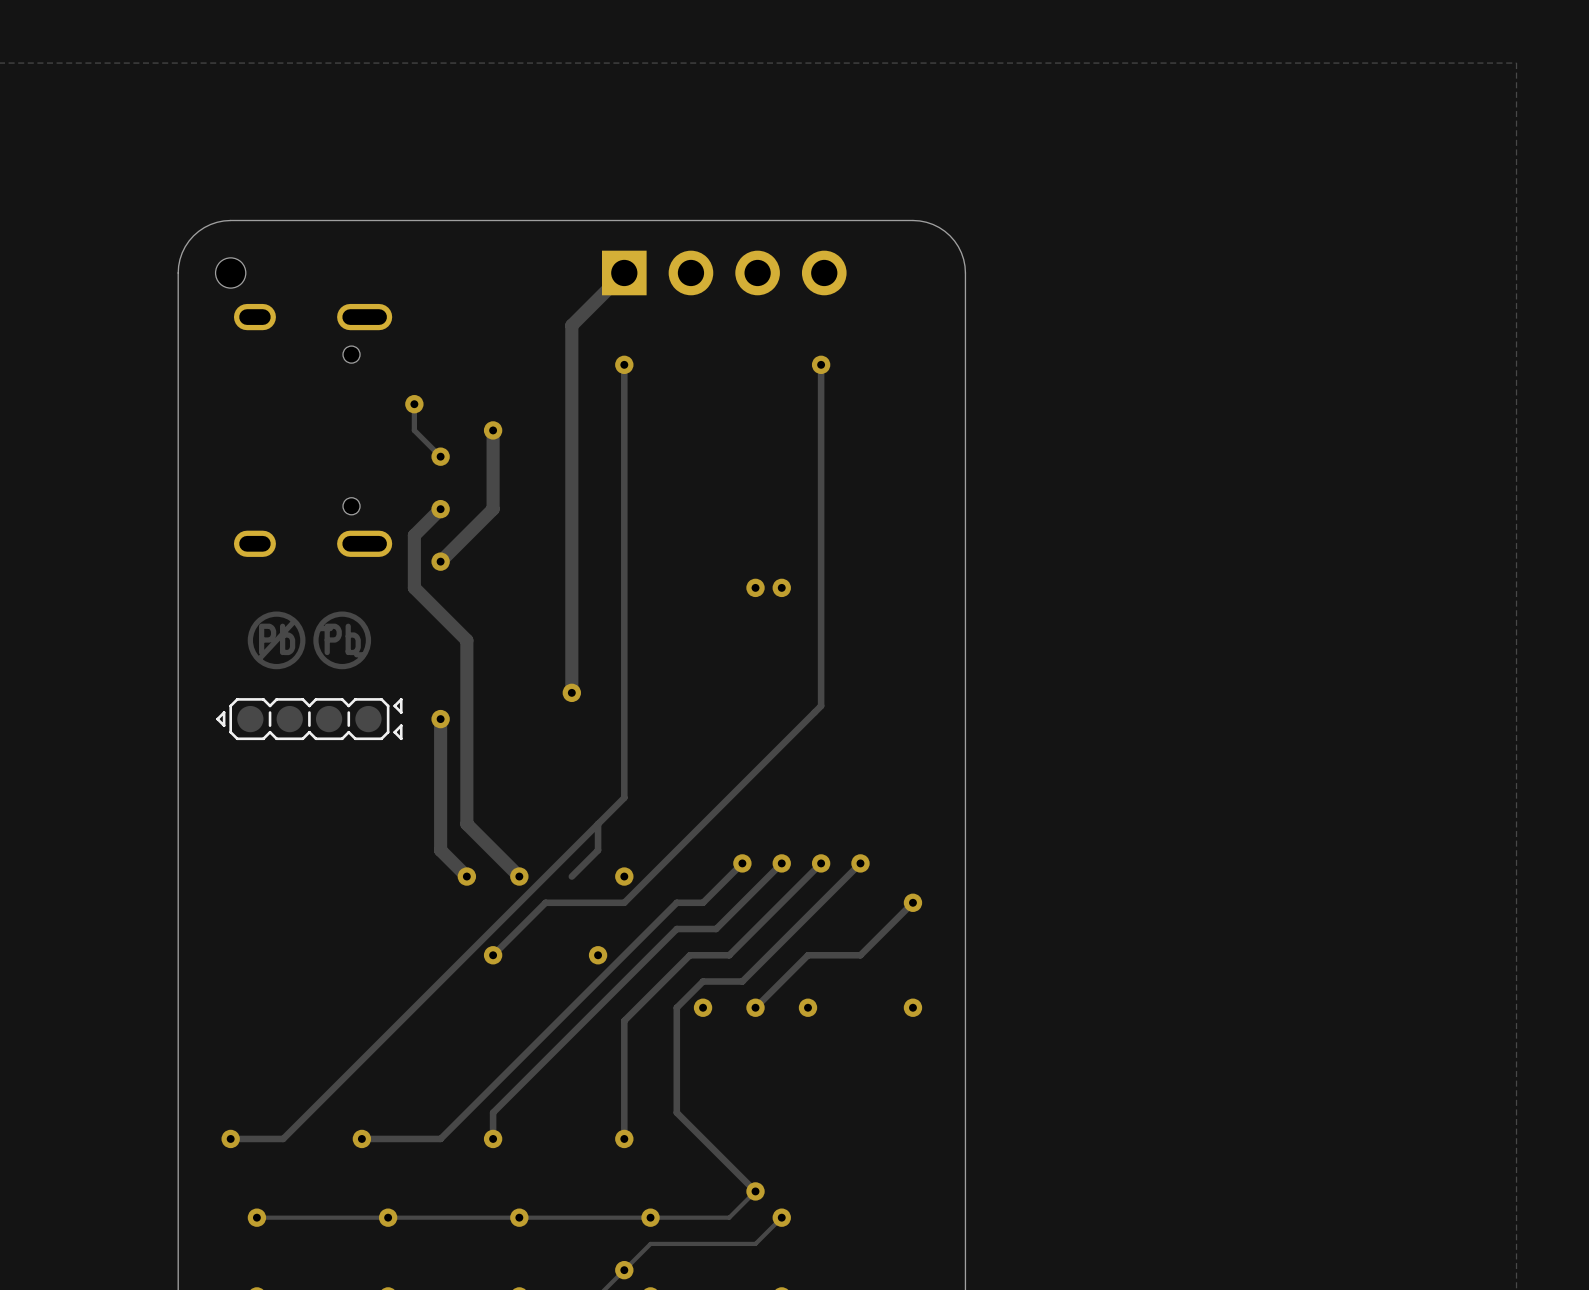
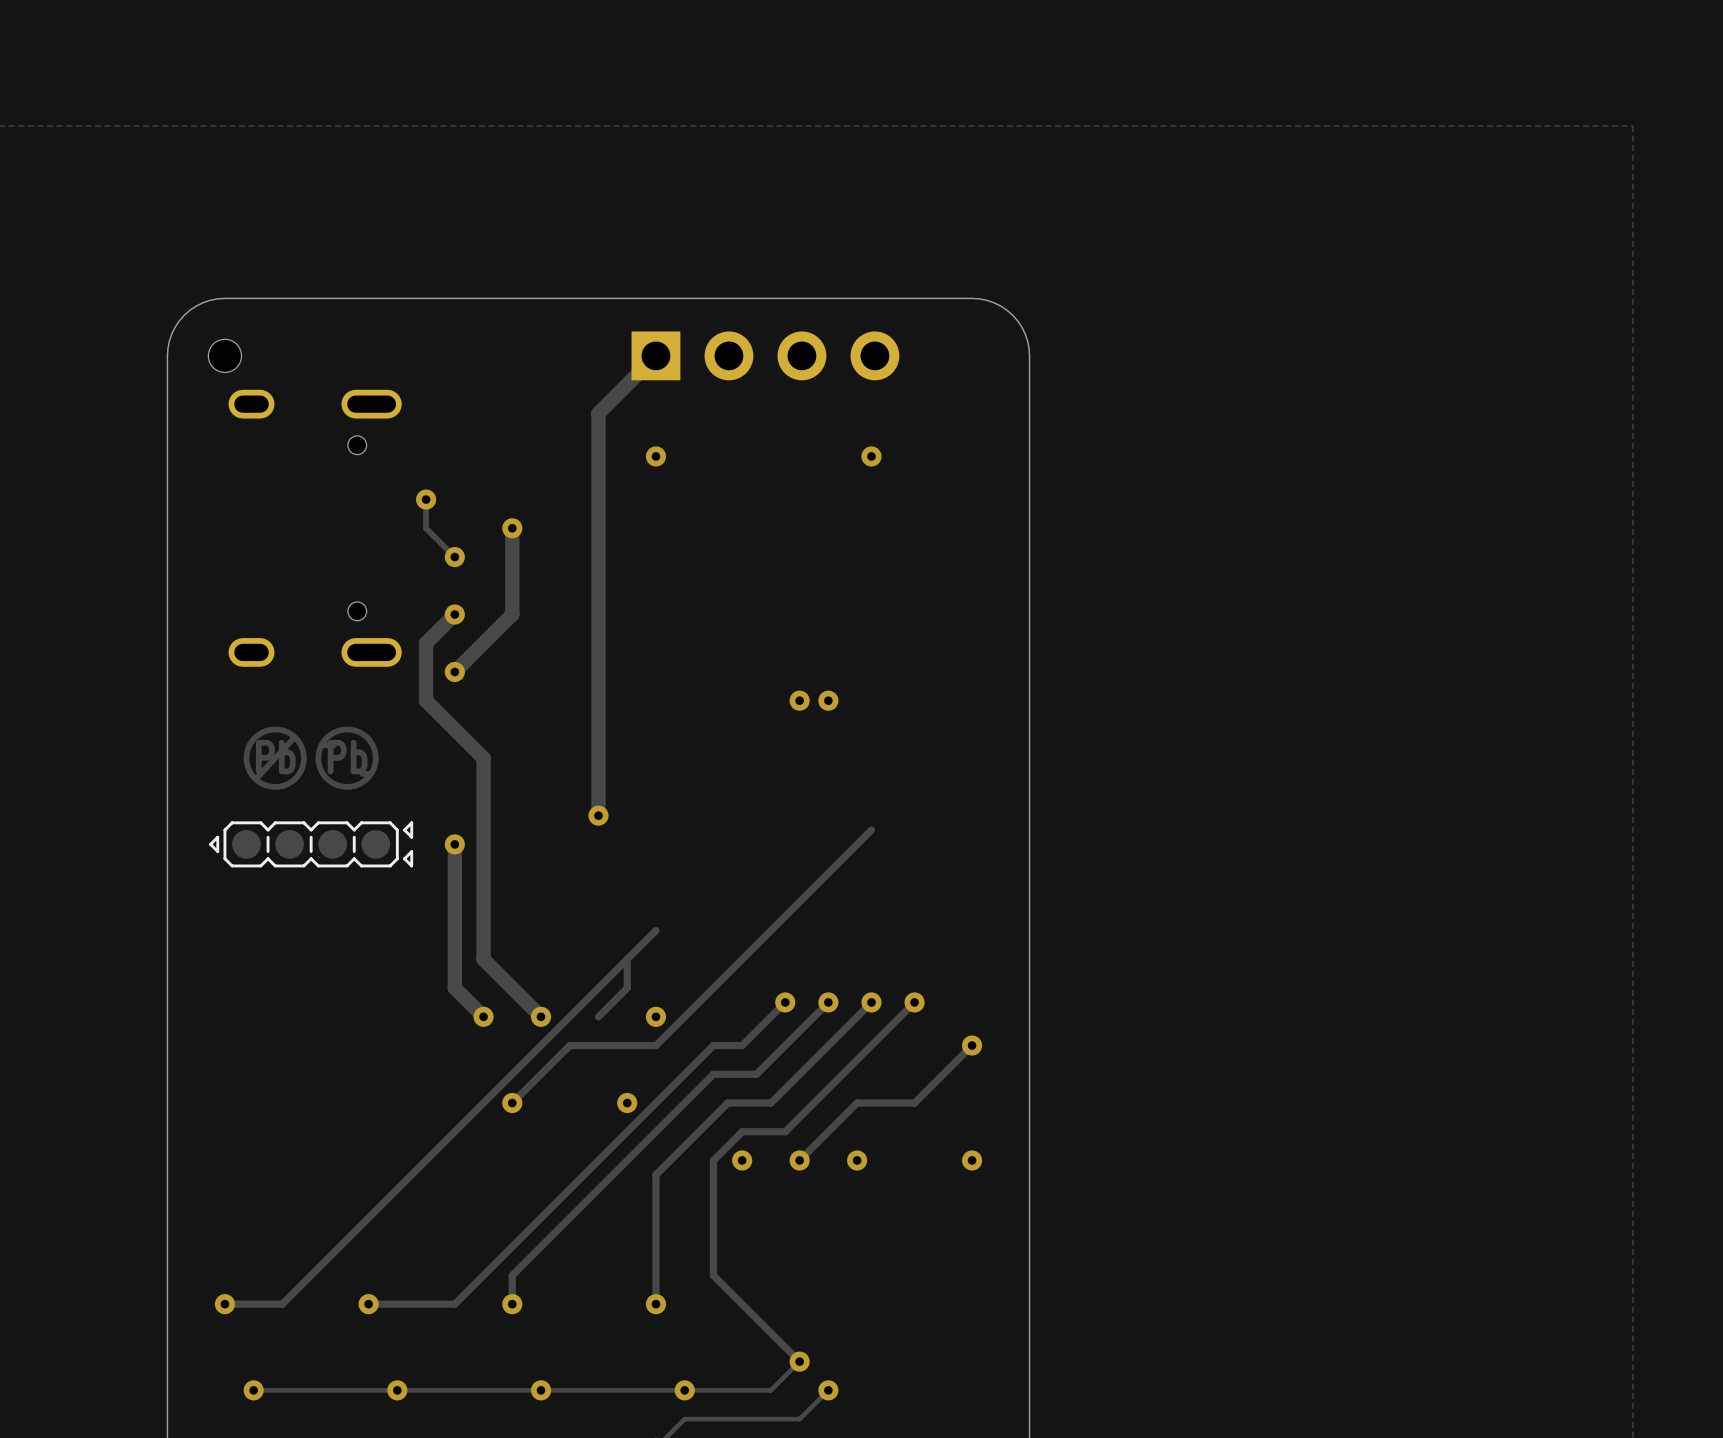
track: (624, 364) (624, 797) -> none
track: (821, 364) (821, 705) -> none

